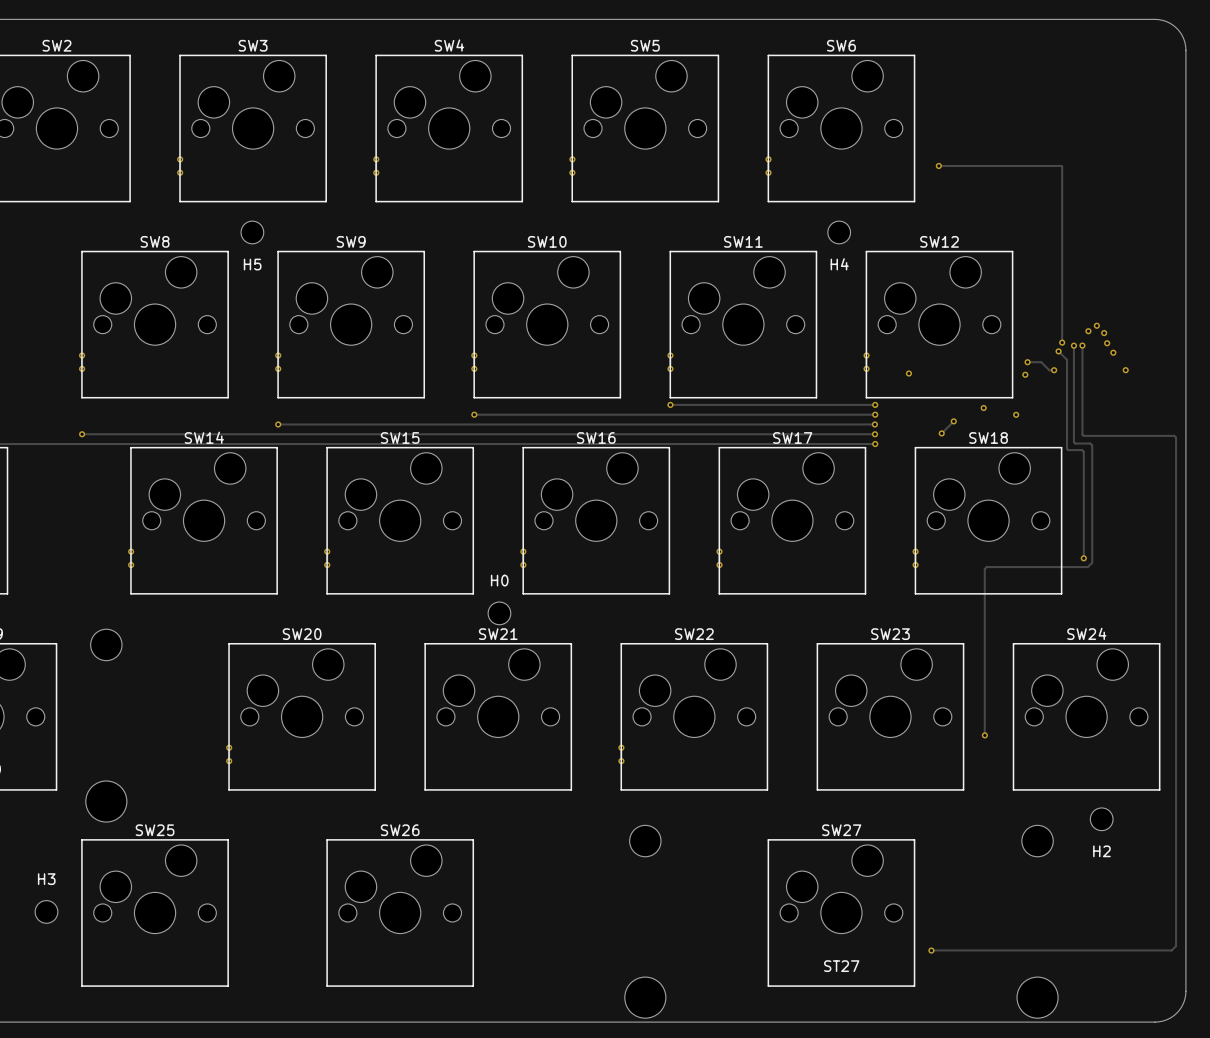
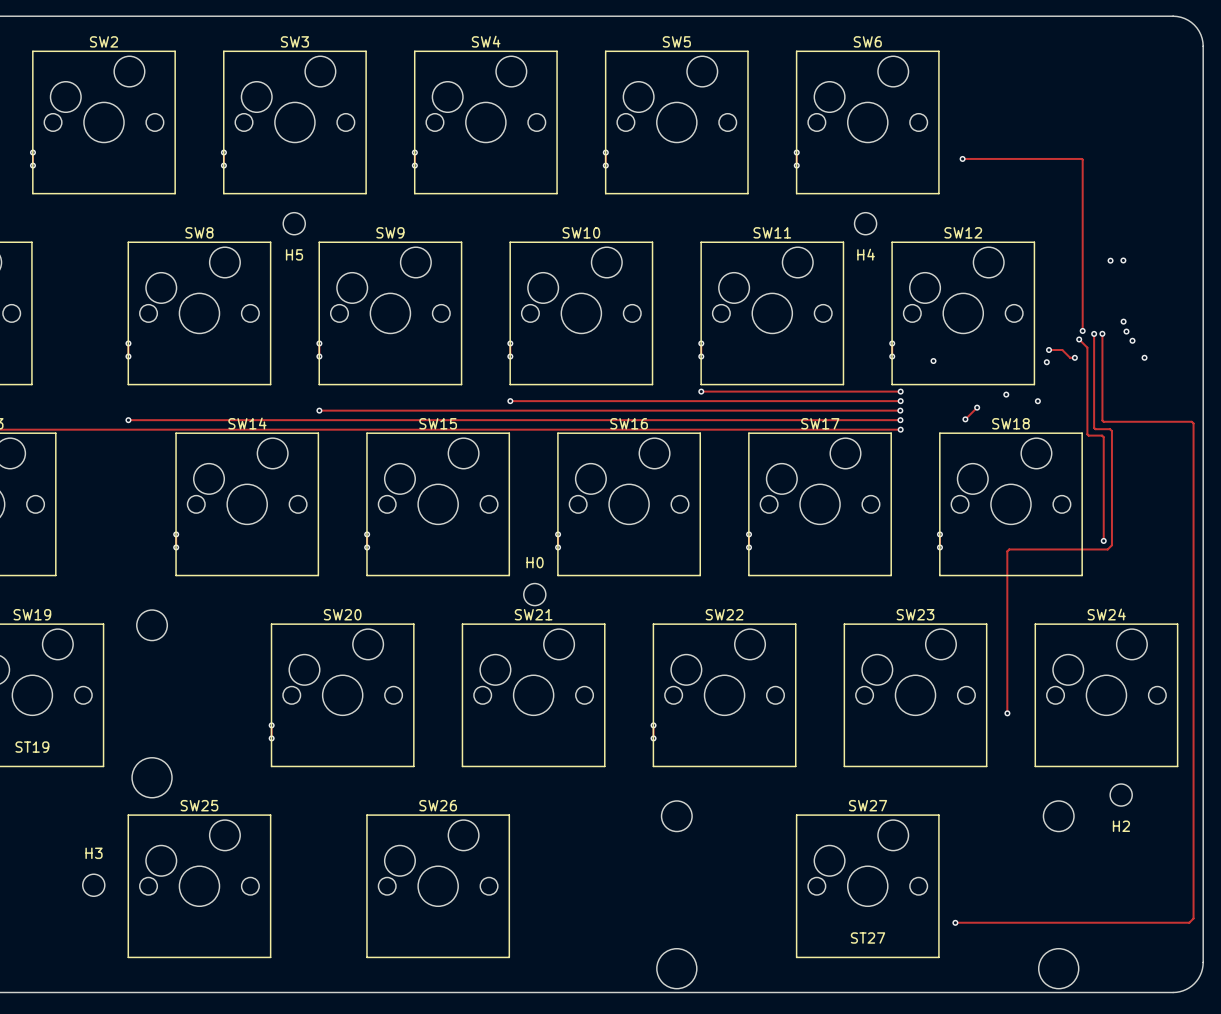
via: none -> (1110, 260)
via: none -> (1123, 260)
via: (1096, 325) -> none
via: (1088, 331) -> none

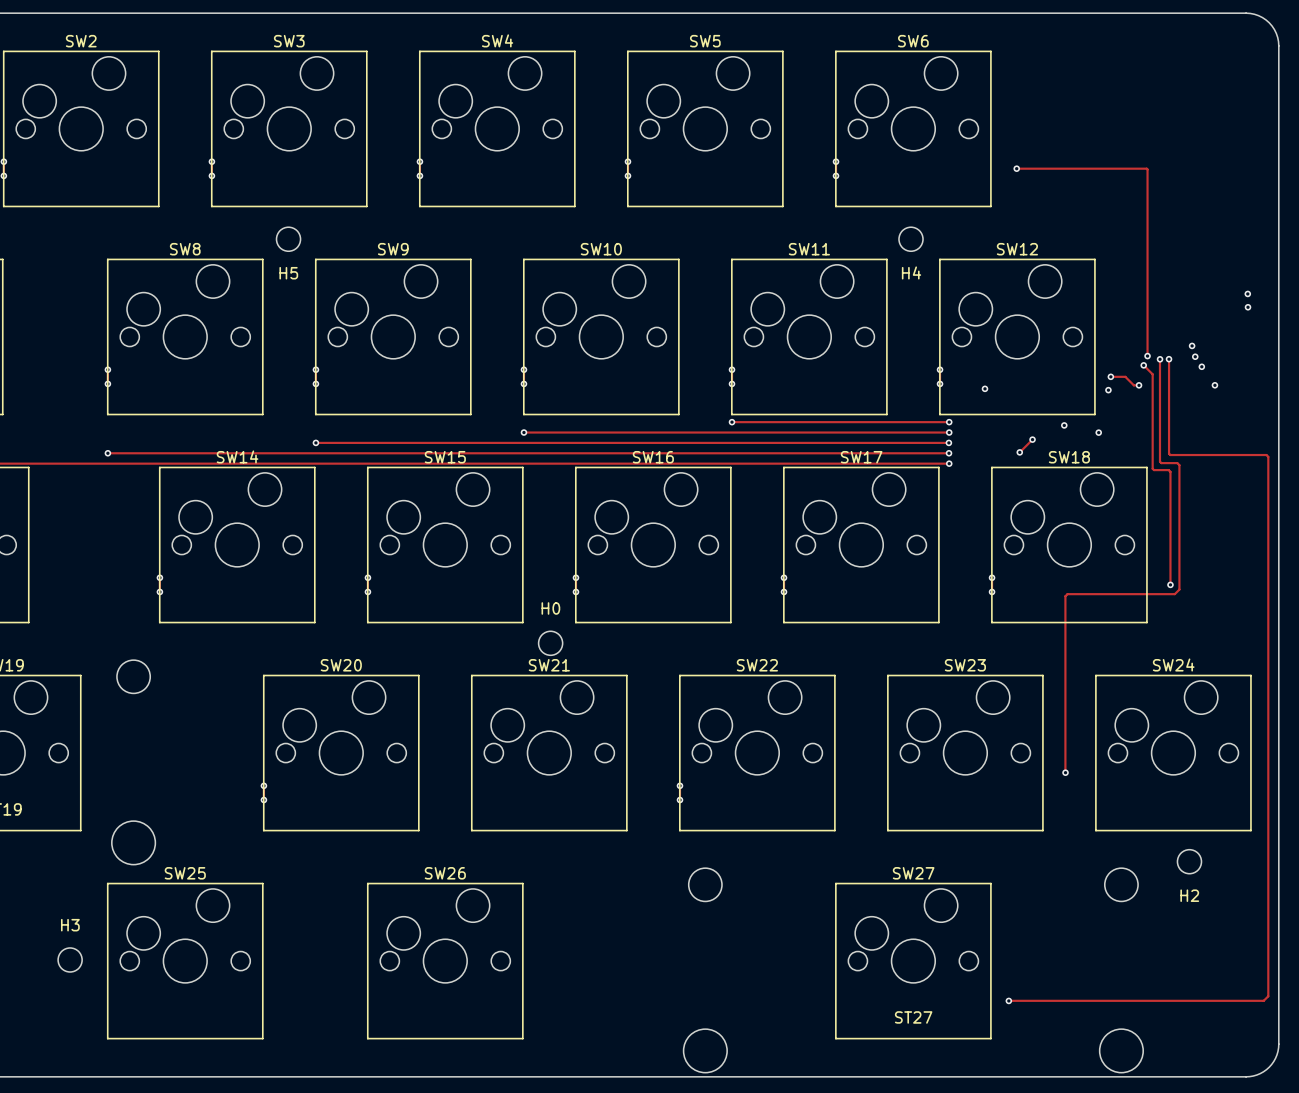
via: (1110, 260) -> none
via: (1123, 260) -> none
via: none -> (1247, 293)
via: none -> (1248, 307)

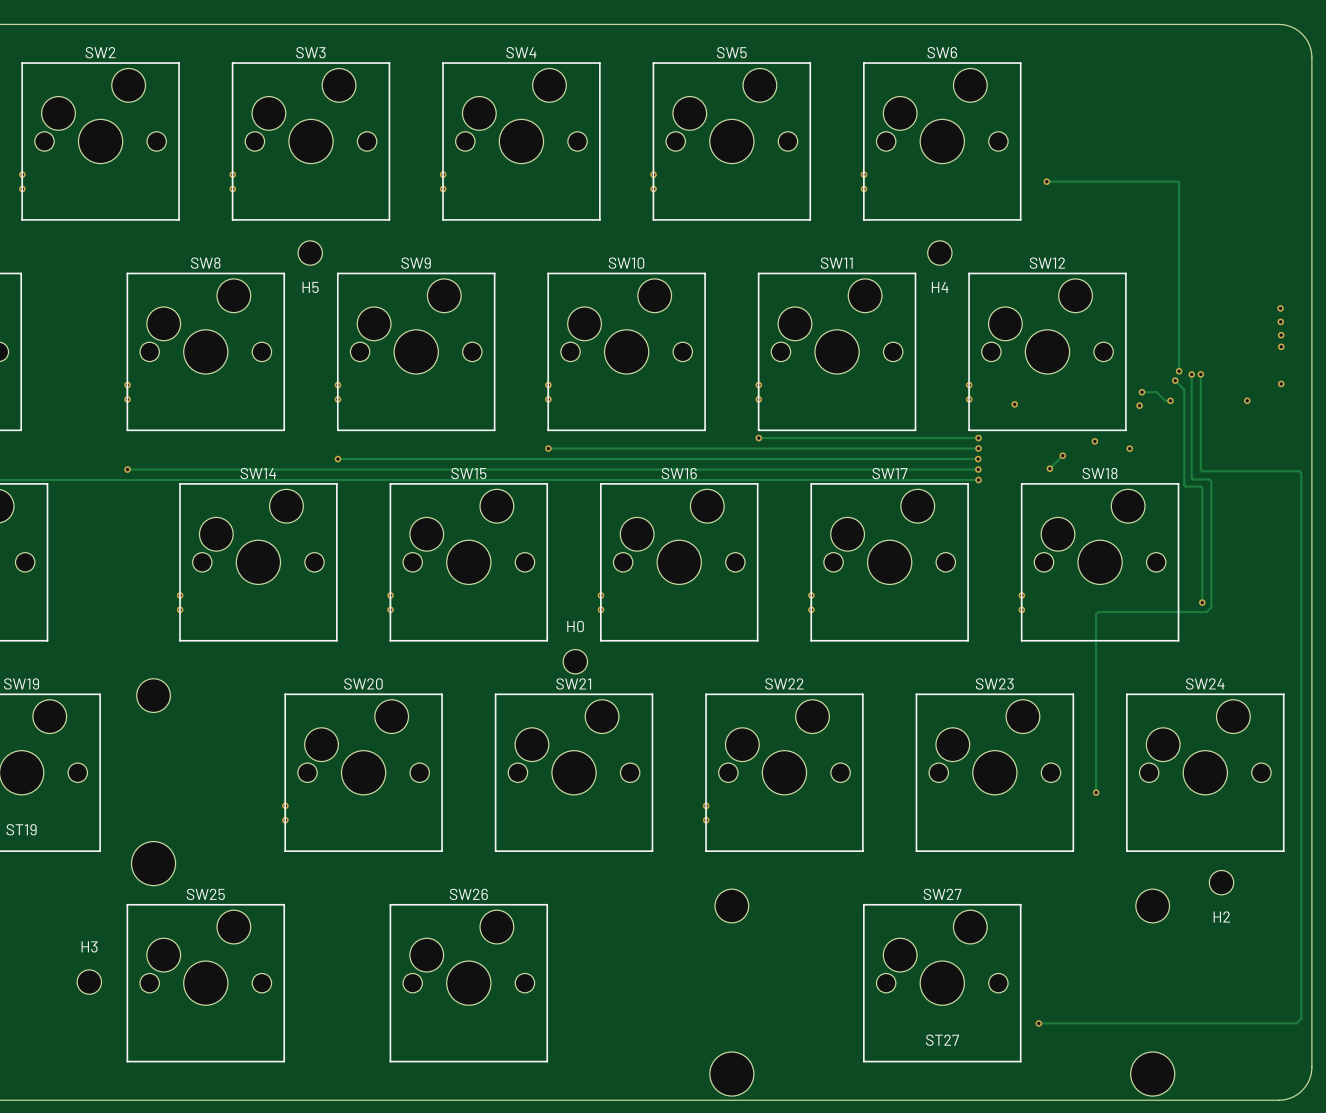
via: none -> (1281, 335)
via: none -> (1281, 346)
via: (1192, 345) -> none
via: (1195, 356) -> none
via: (1201, 366) -> none
via: none -> (1281, 383)

